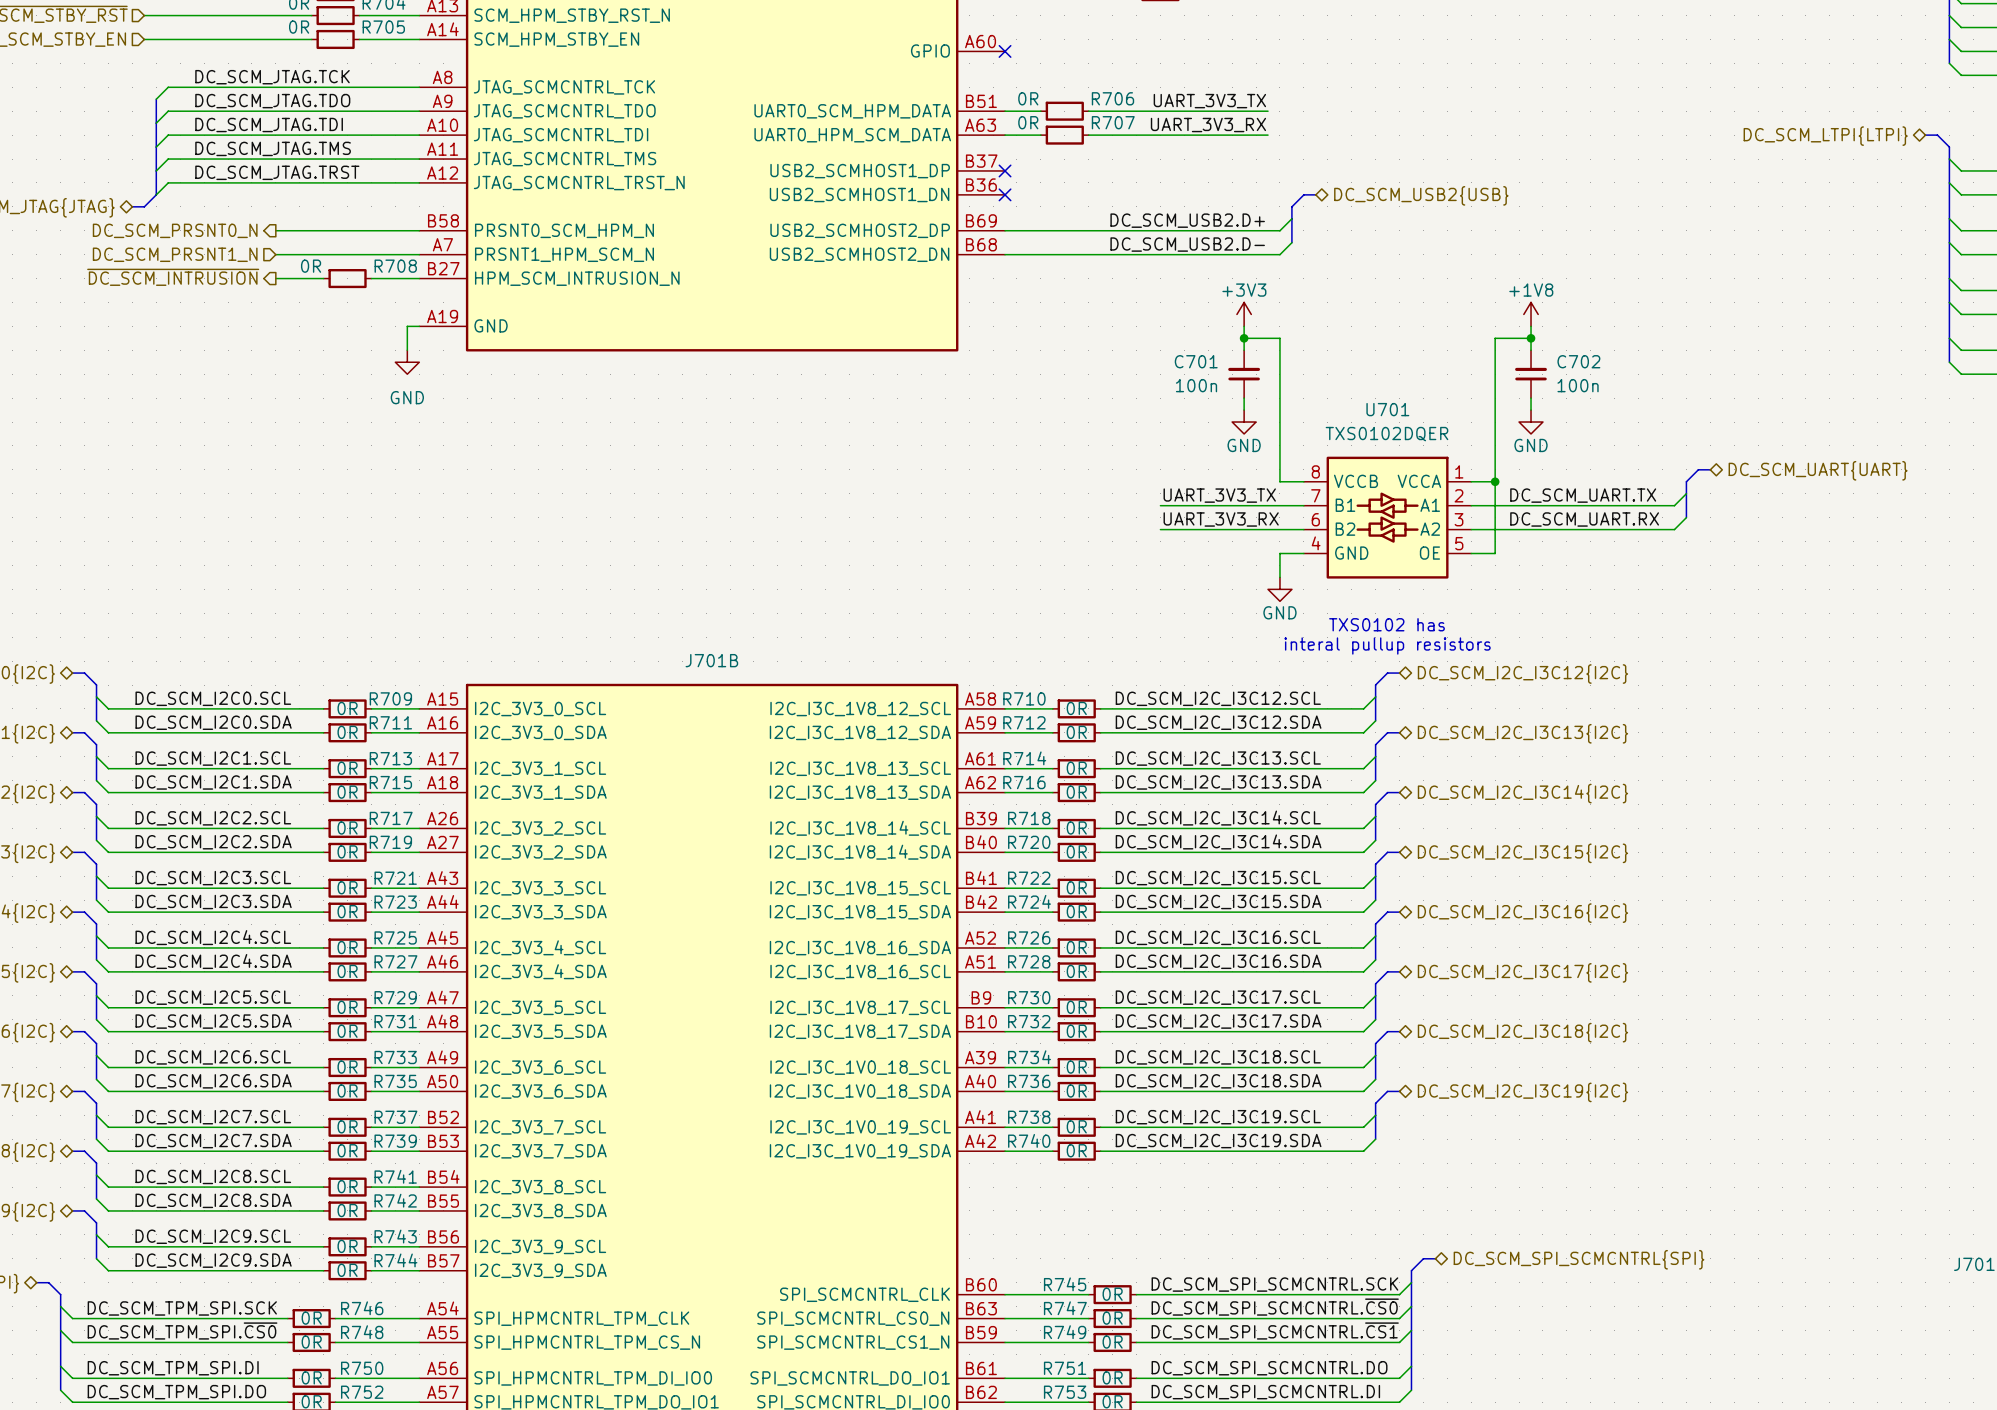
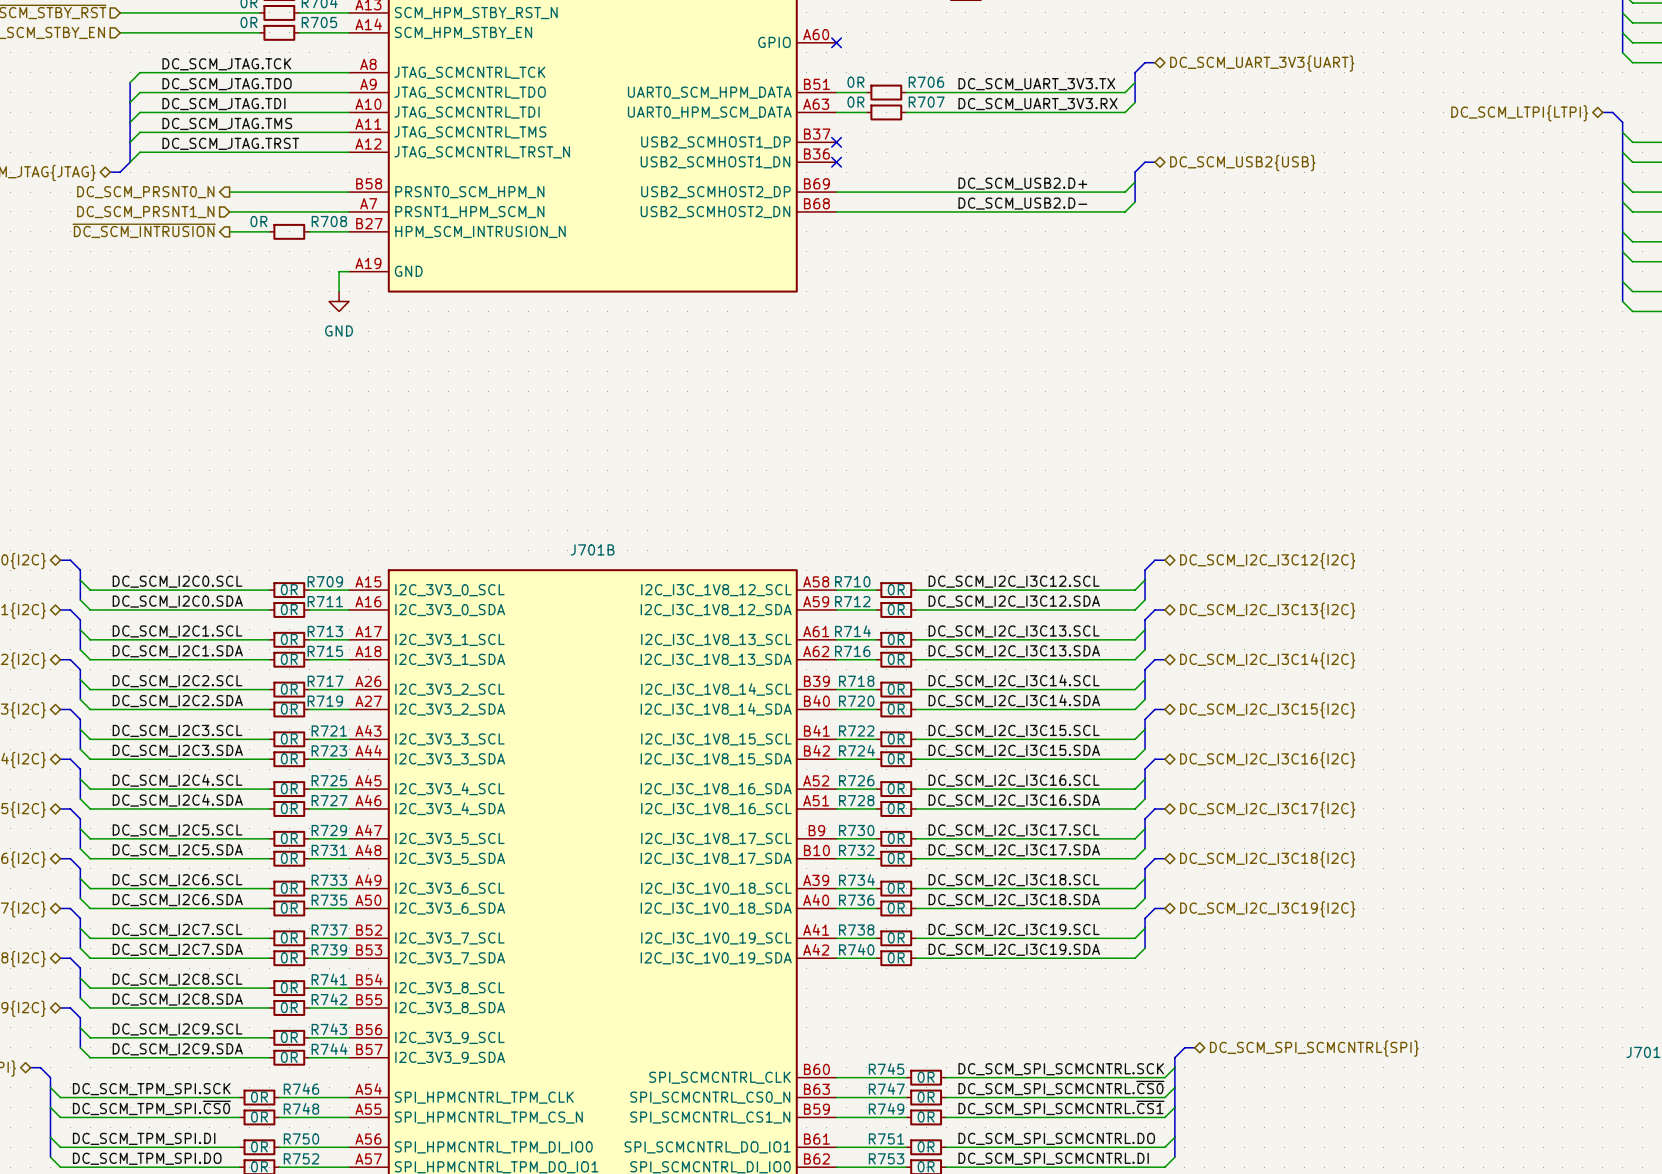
bus: none -> (1154, 62) (1145, 62) (1135, 72) (1135, 102)
hierarchical label: none -> DC_SCM_UART_3V3{UART} (1262, 63)
wire: none -> (1135, 82) (1125, 92) (1055, 92)
label: UART_3V3_TX (1209, 101) -> none
label: none -> DC_SCM_UART_3V3.TX (1036, 84)
wire: none -> (1135, 102) (1125, 112) (1055, 112)
label: UART_3V3_RX (1208, 125) -> none
label: none -> DC_SCM_UART_3V3.RX (1038, 104)
bus: (1315, 194) (1303, 194) (1291, 206) (1291, 242) -> (1154, 162) (1145, 162) (1135, 172) (1135, 202)
hierarchical label position: DC_SCM_USB2{USB} (1421, 195) -> DC_SCM_USB2{USB} (1242, 163)
wire: (1291, 218) (1279, 230) -> (1135, 182) (1125, 192) (1065, 192)
label position: DC_SCM_USB2.D+ (1187, 220) -> DC_SCM_USB2.D+ (1022, 183)
wire: (1291, 242) (1279, 254) -> (1135, 202) (1125, 211) (1065, 211)
label position: DC_SCM_USB2.D- (1187, 244) -> DC_SCM_USB2.D- (1022, 203)
power symbol: +3V3 (1244, 314) -> none
power symbol: +1V8 (1531, 314) -> none
wire: (1244, 326) (1244, 350) -> none
wire: (1531, 326) (1531, 350) -> none
wire: (1244, 338) (1279, 338) (1279, 481) (1303, 481) -> none
junction: (1244, 338) -> none
wire: (1531, 338) (1495, 338) (1495, 553) (1471, 553) -> none
junction: (1531, 338) -> none
C701: (1244, 374) -> none
C702: (1531, 374) -> none
wire: (1244, 398) (1244, 410) -> none
wire: (1531, 398) (1531, 410) -> none
power symbol: GND (1244, 422) -> none
power symbol: GND (1531, 422) -> none
bus: (1710, 469) (1698, 469) (1686, 481) (1686, 517) -> none
hierarchical label: DC_SCM_UART{UART} (1818, 470) -> none
wire: (1471, 481) (1495, 481) -> none
junction: (1495, 481) -> none
wire: (1686, 493) (1674, 505) (1471, 505) -> none
label: UART_3V3_TX (1219, 495) -> none
label: DC_SCM_UART.TX (1583, 495) -> none
wire: (1160, 505) (1303, 505) -> none
U701: (1387, 517) -> none
wire: (1686, 517) (1674, 529) (1471, 529) -> none
label: UART_3V3_RX (1221, 519) -> none
label: DC_SCM_UART.RX (1584, 519) -> none
wire: (1160, 529) (1303, 529) -> none
wire: (1303, 553) (1279, 553) (1279, 577) -> none
power symbol: GND (1279, 589) -> none
text: TXS0102 has (1386, 624) -> none
text: interal pullup resistors (1387, 646) -> none

